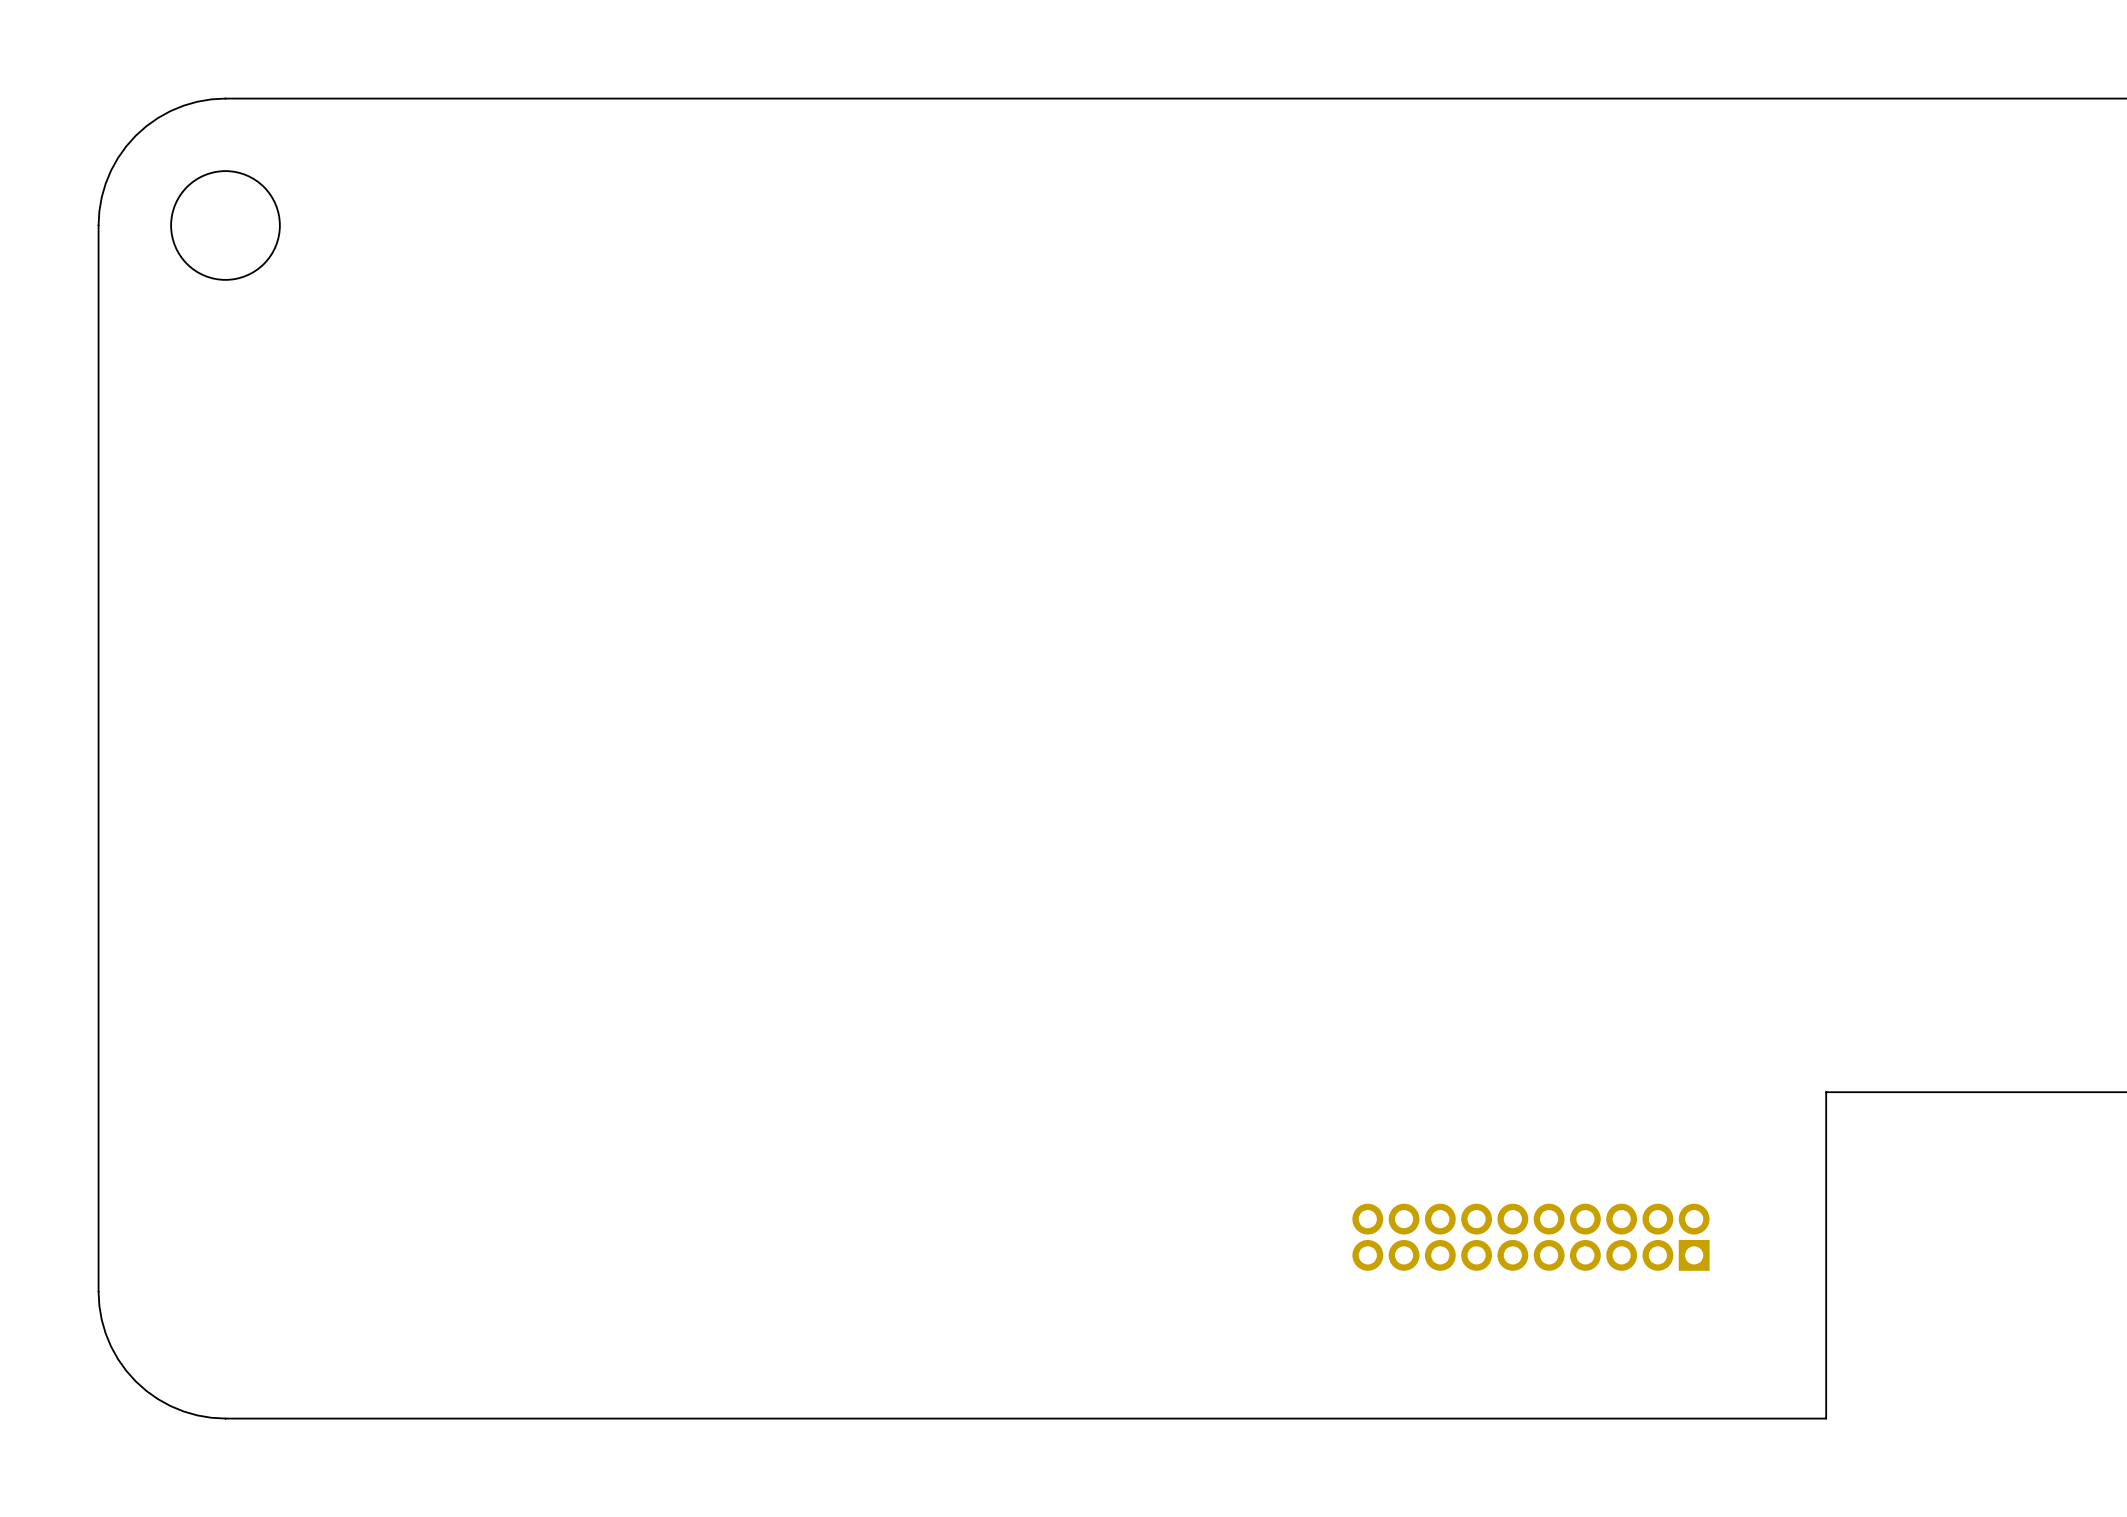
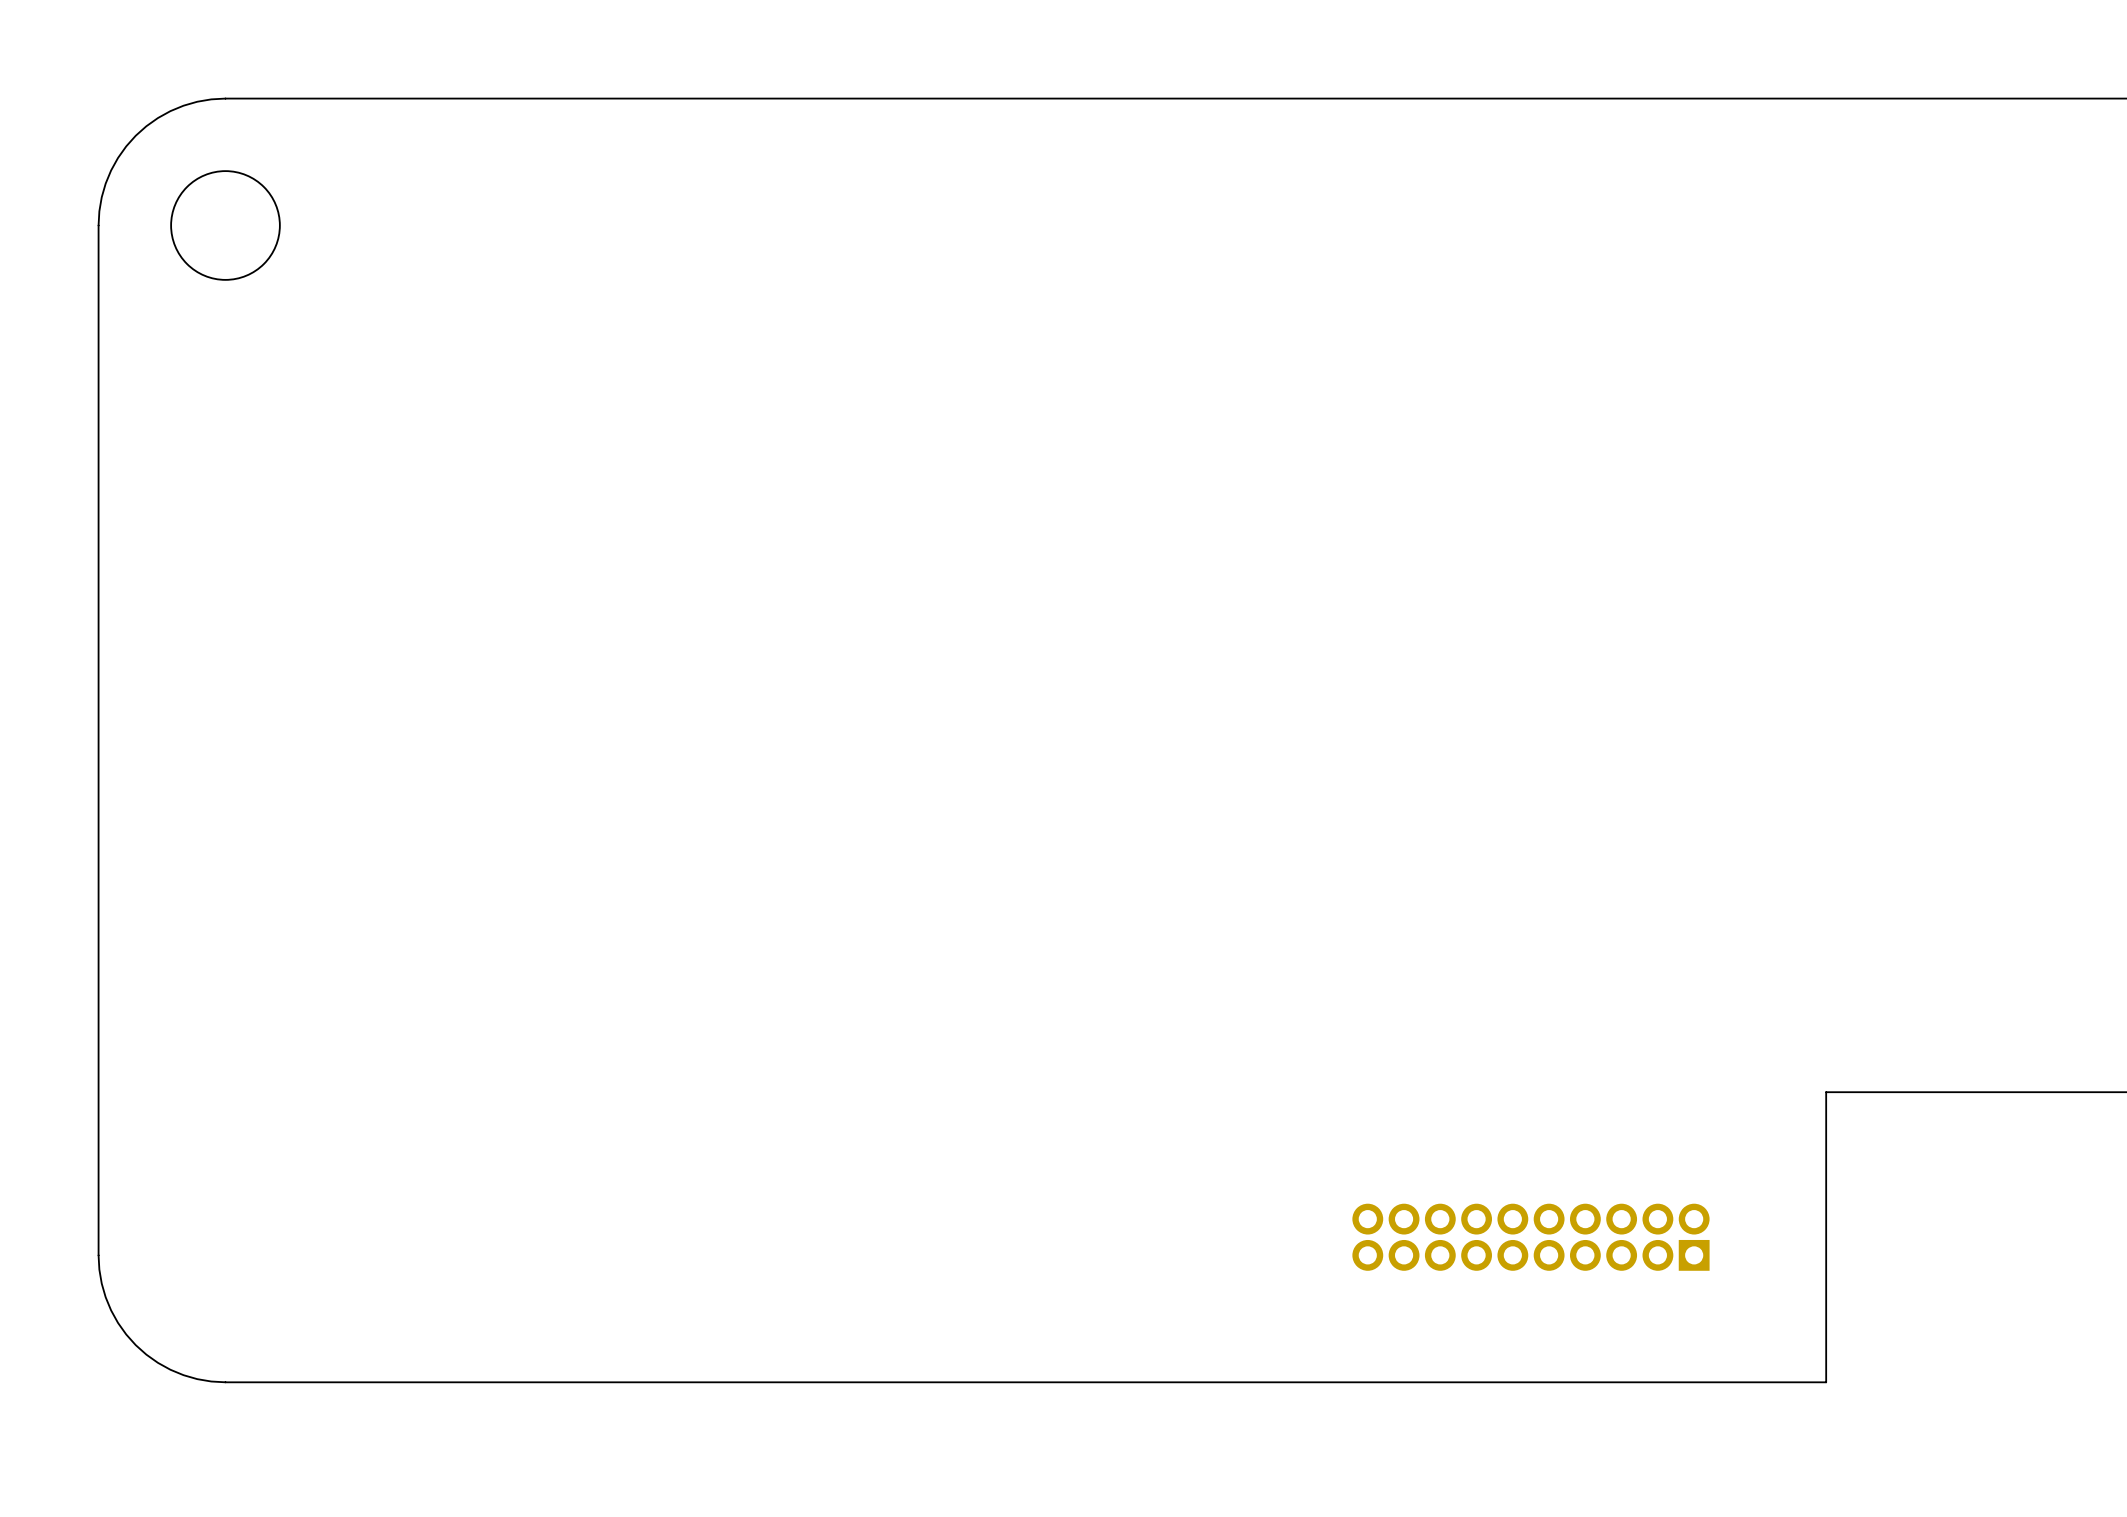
board edge: (98, 1255) (98, 1291) (101, 1319) (111, 1346) (118, 1359) (135, 1381) (157, 1399) (183, 1411) (211, 1417) (1826, 1418) (1826, 1382) -> (98, 1255) (101, 1283) (111, 1310) (126, 1334) (135, 1345) (146, 1354) (170, 1369) (183, 1375) (211, 1381) (1826, 1382)

